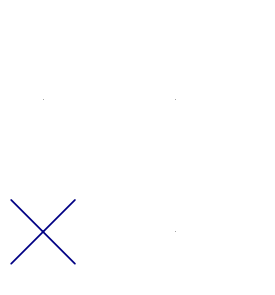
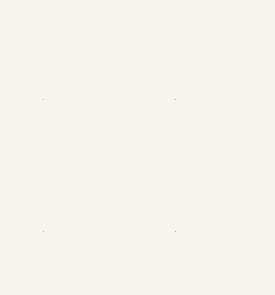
no-connect mark: (43, 231) -> none

